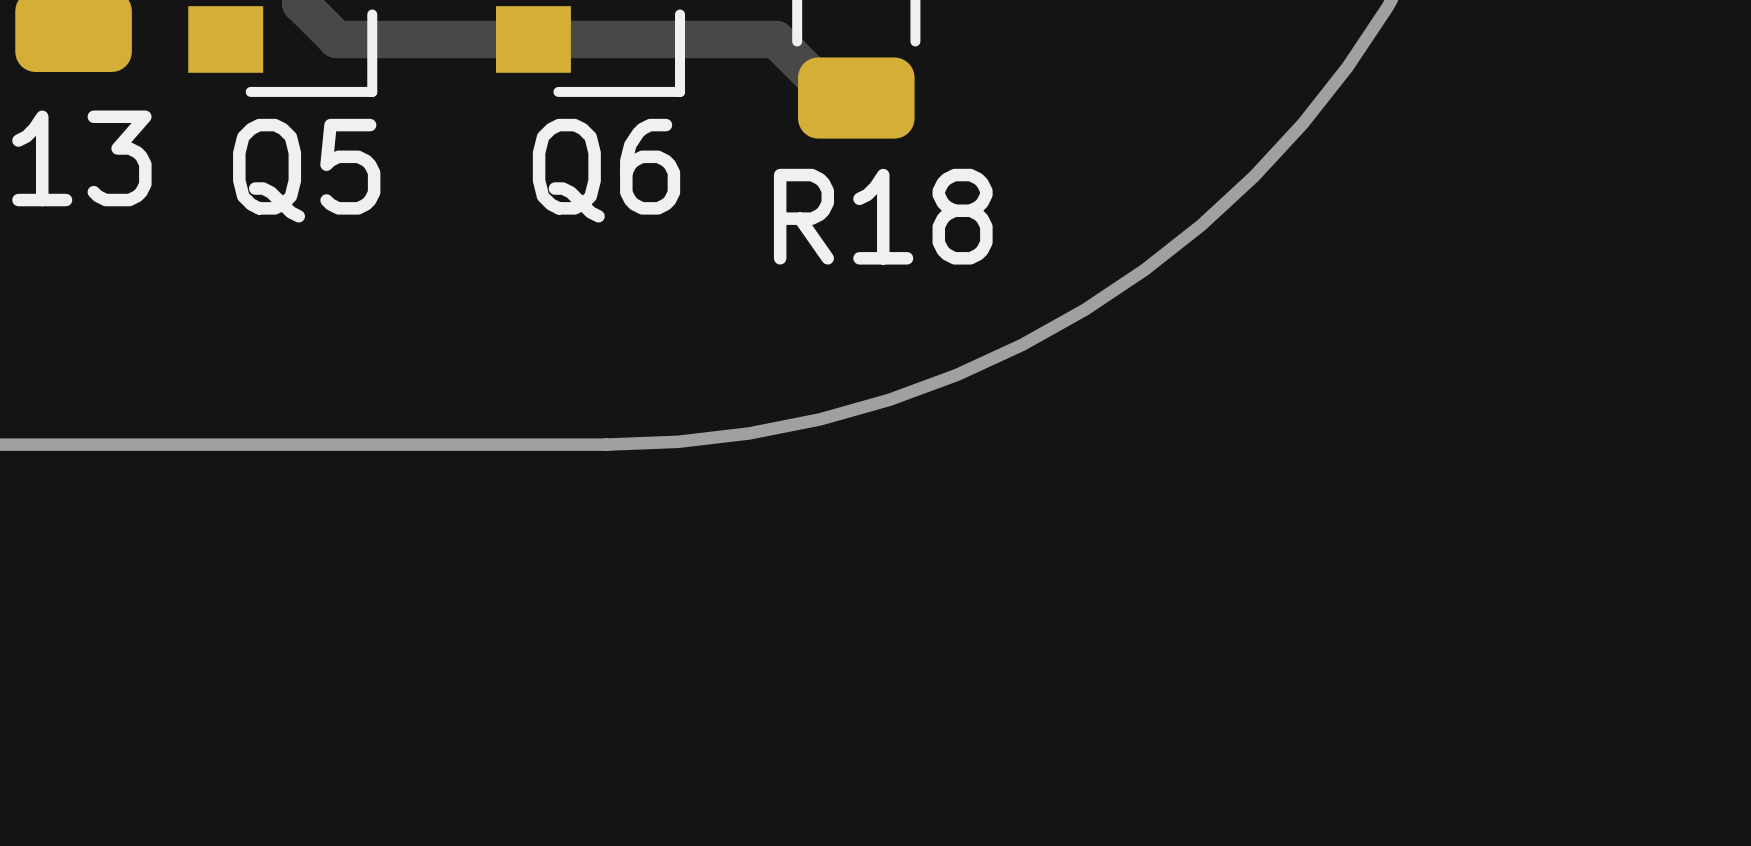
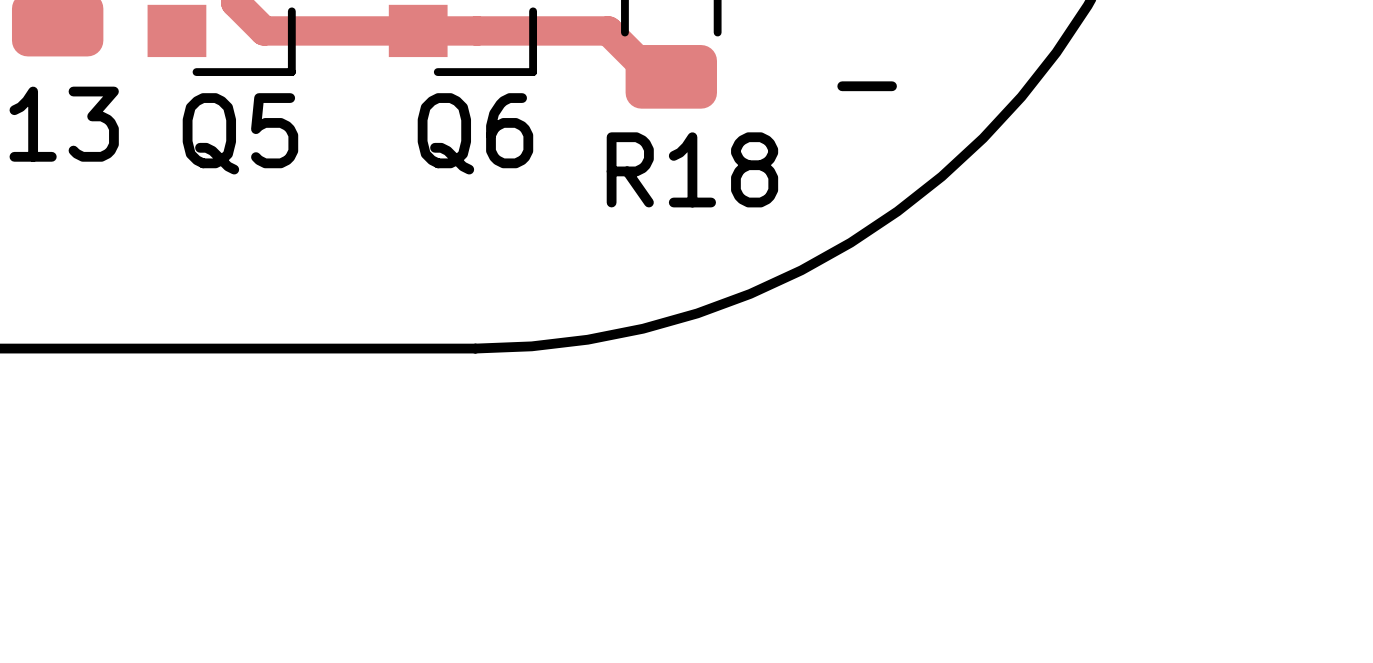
text: none -> - (867, 86)

